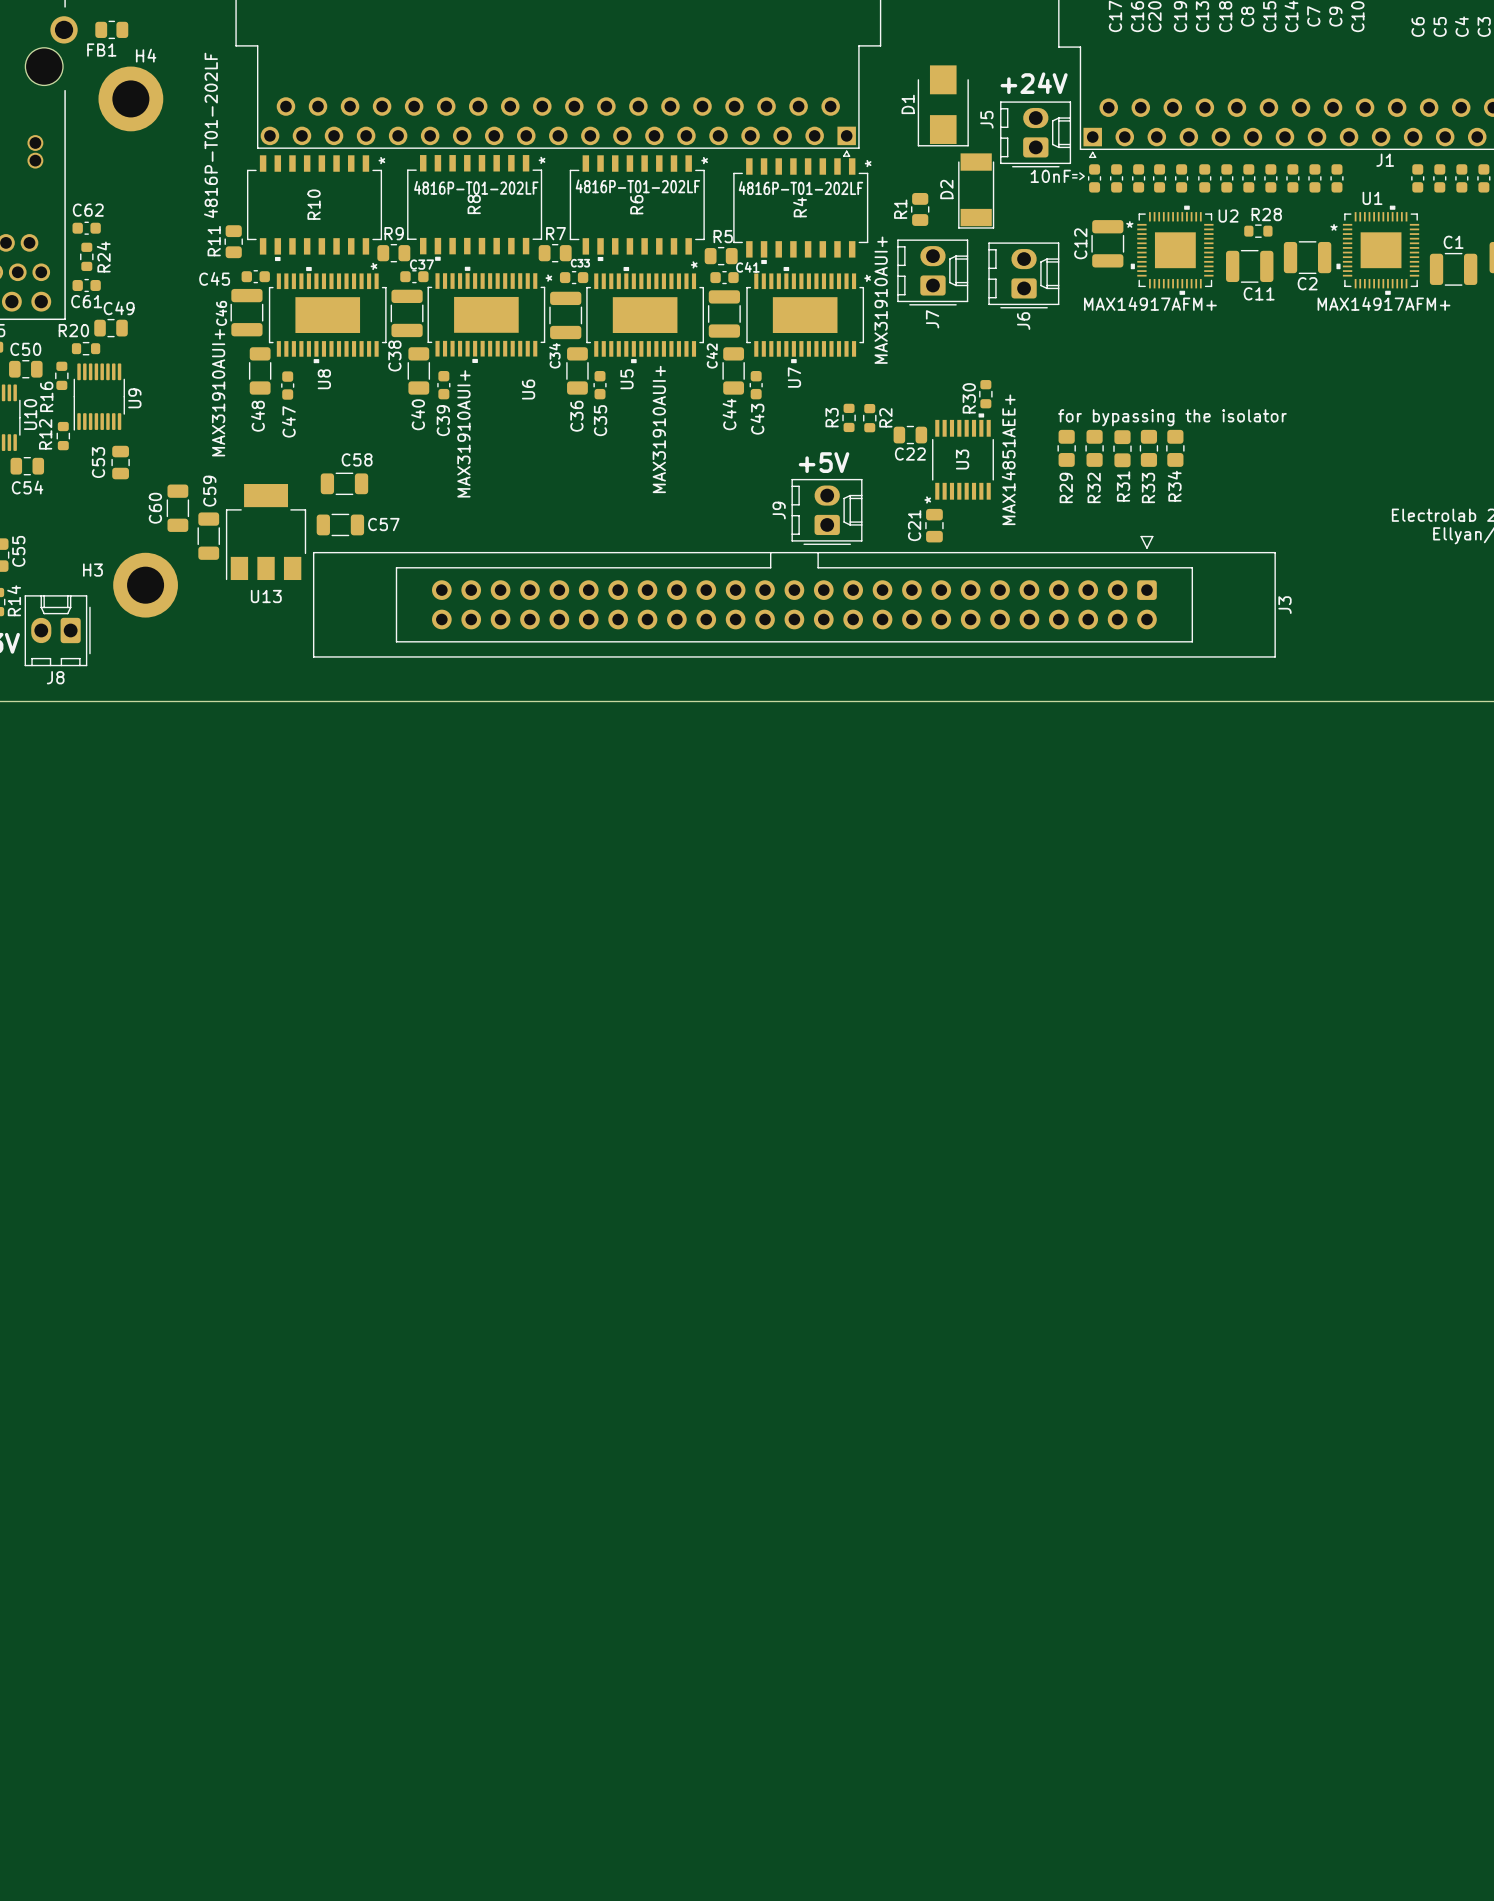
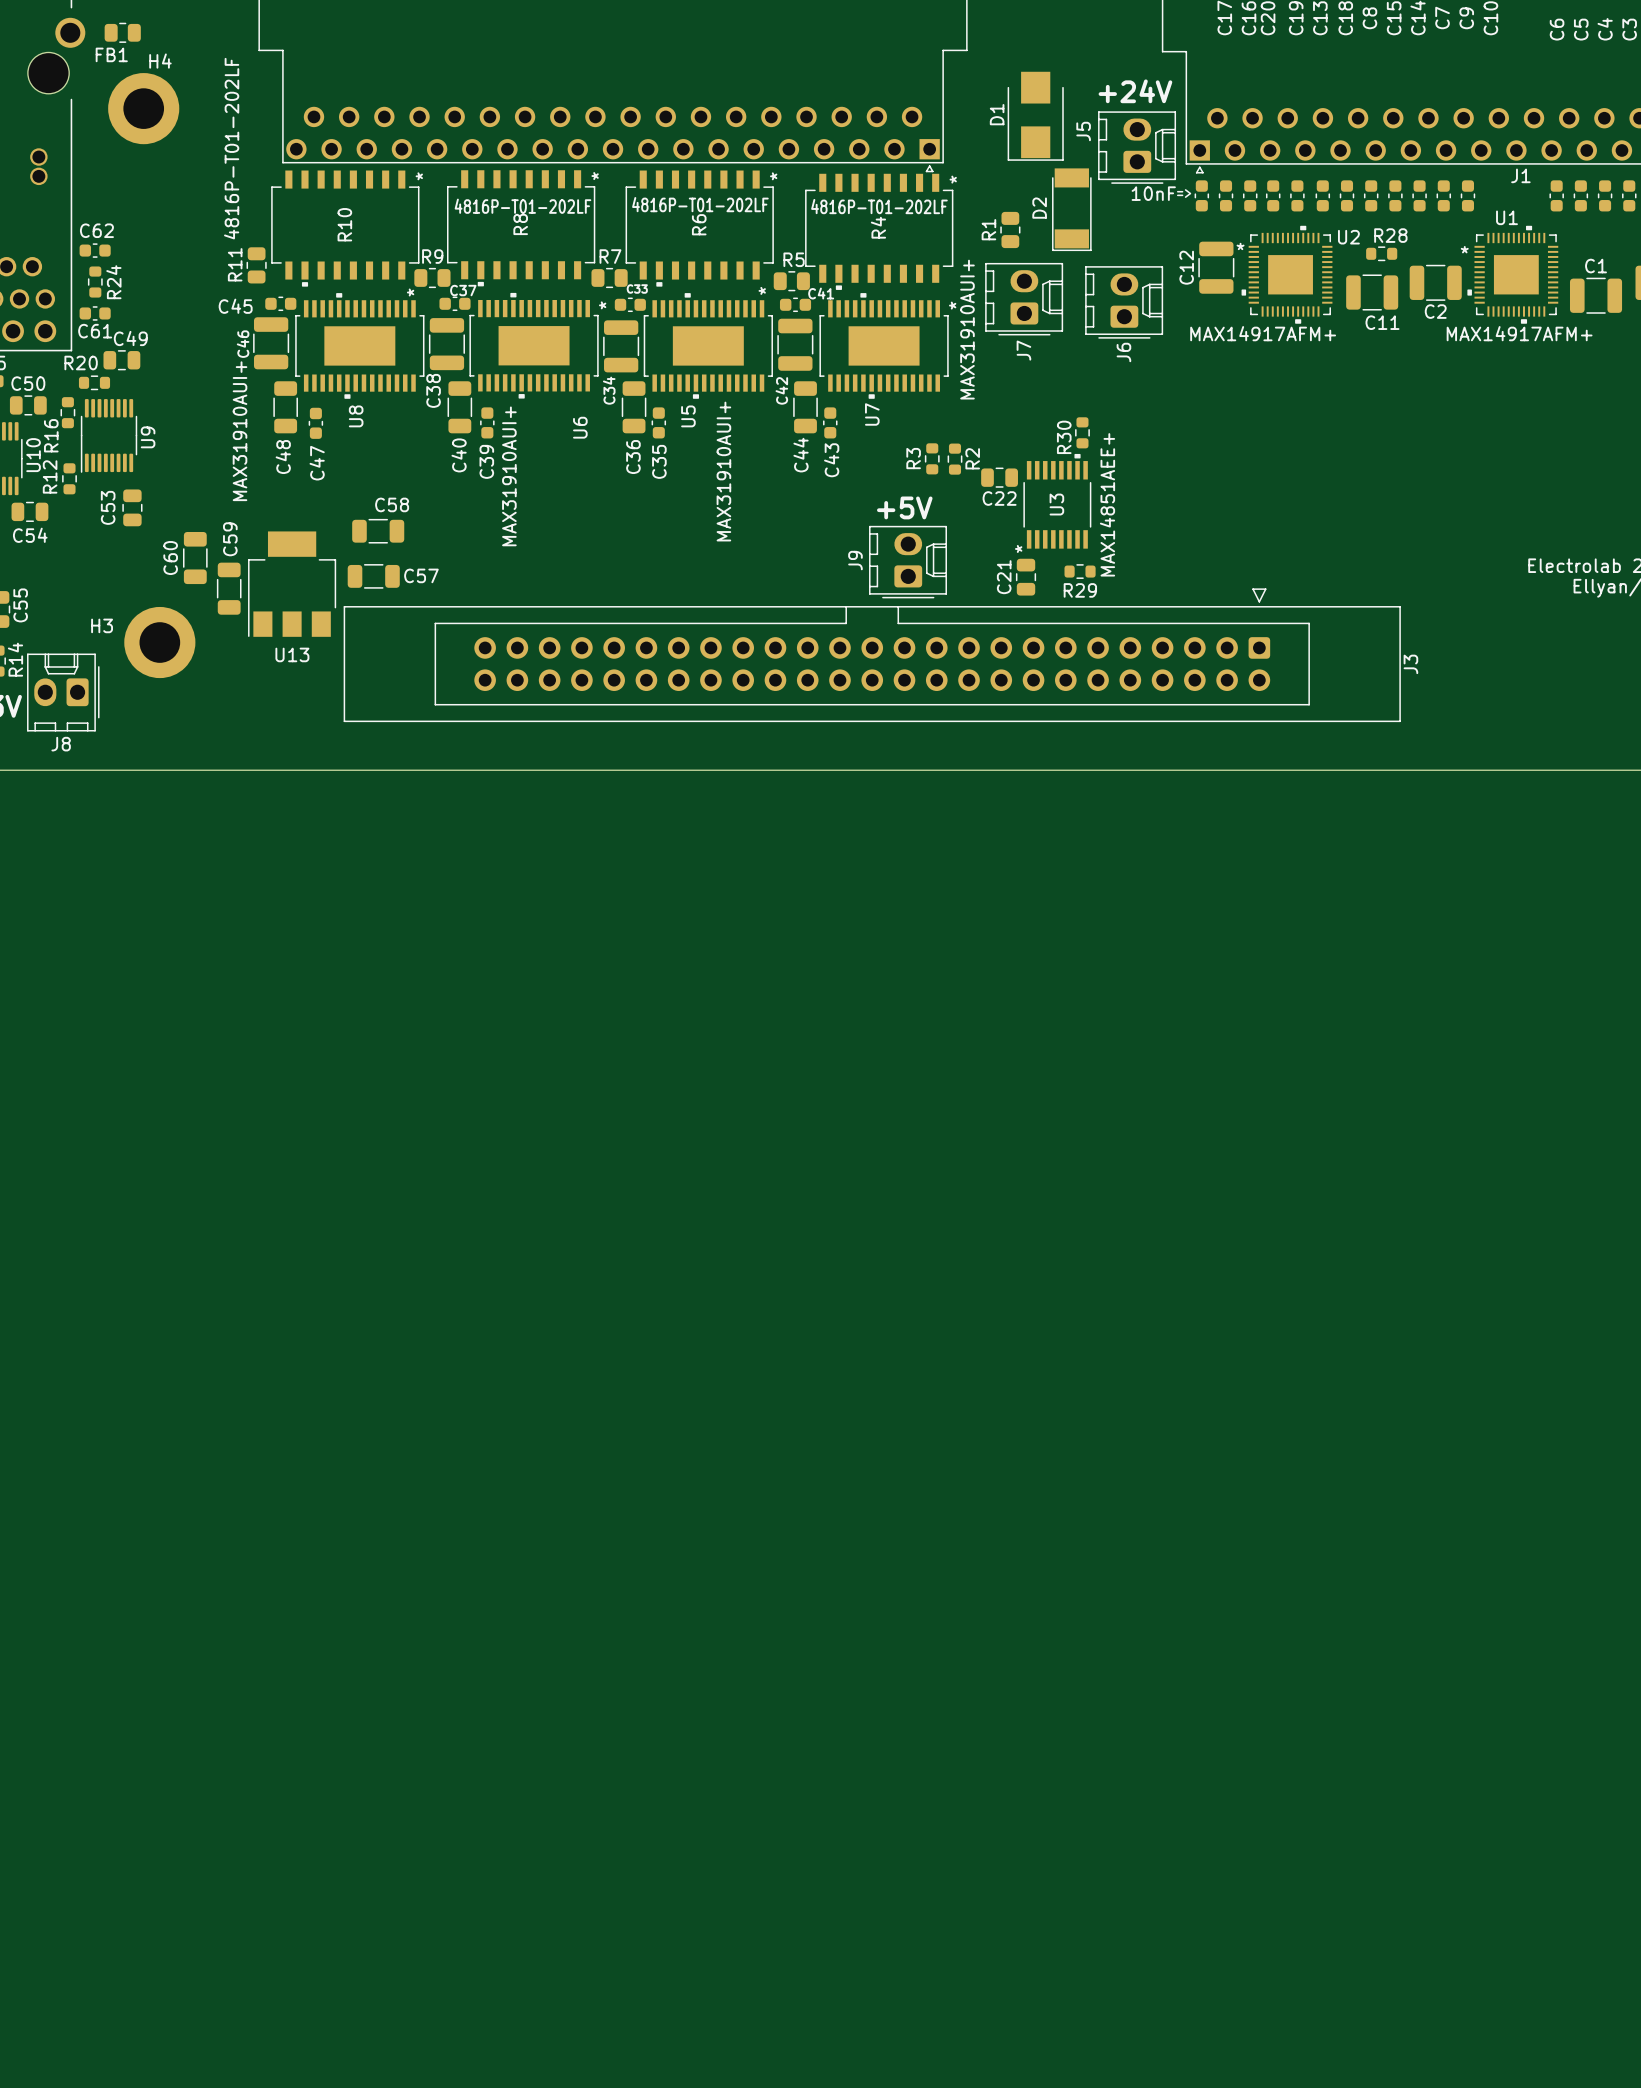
text: for bypassing the isolator (1172, 417) -> none
R29 footprint: [1057, 429, 1076, 467] -> [1064, 564, 1096, 579]
R32: (1094, 448) -> none
R31: (1122, 448) -> none
R33: (1148, 448) -> none
R34: (1175, 448) -> none

